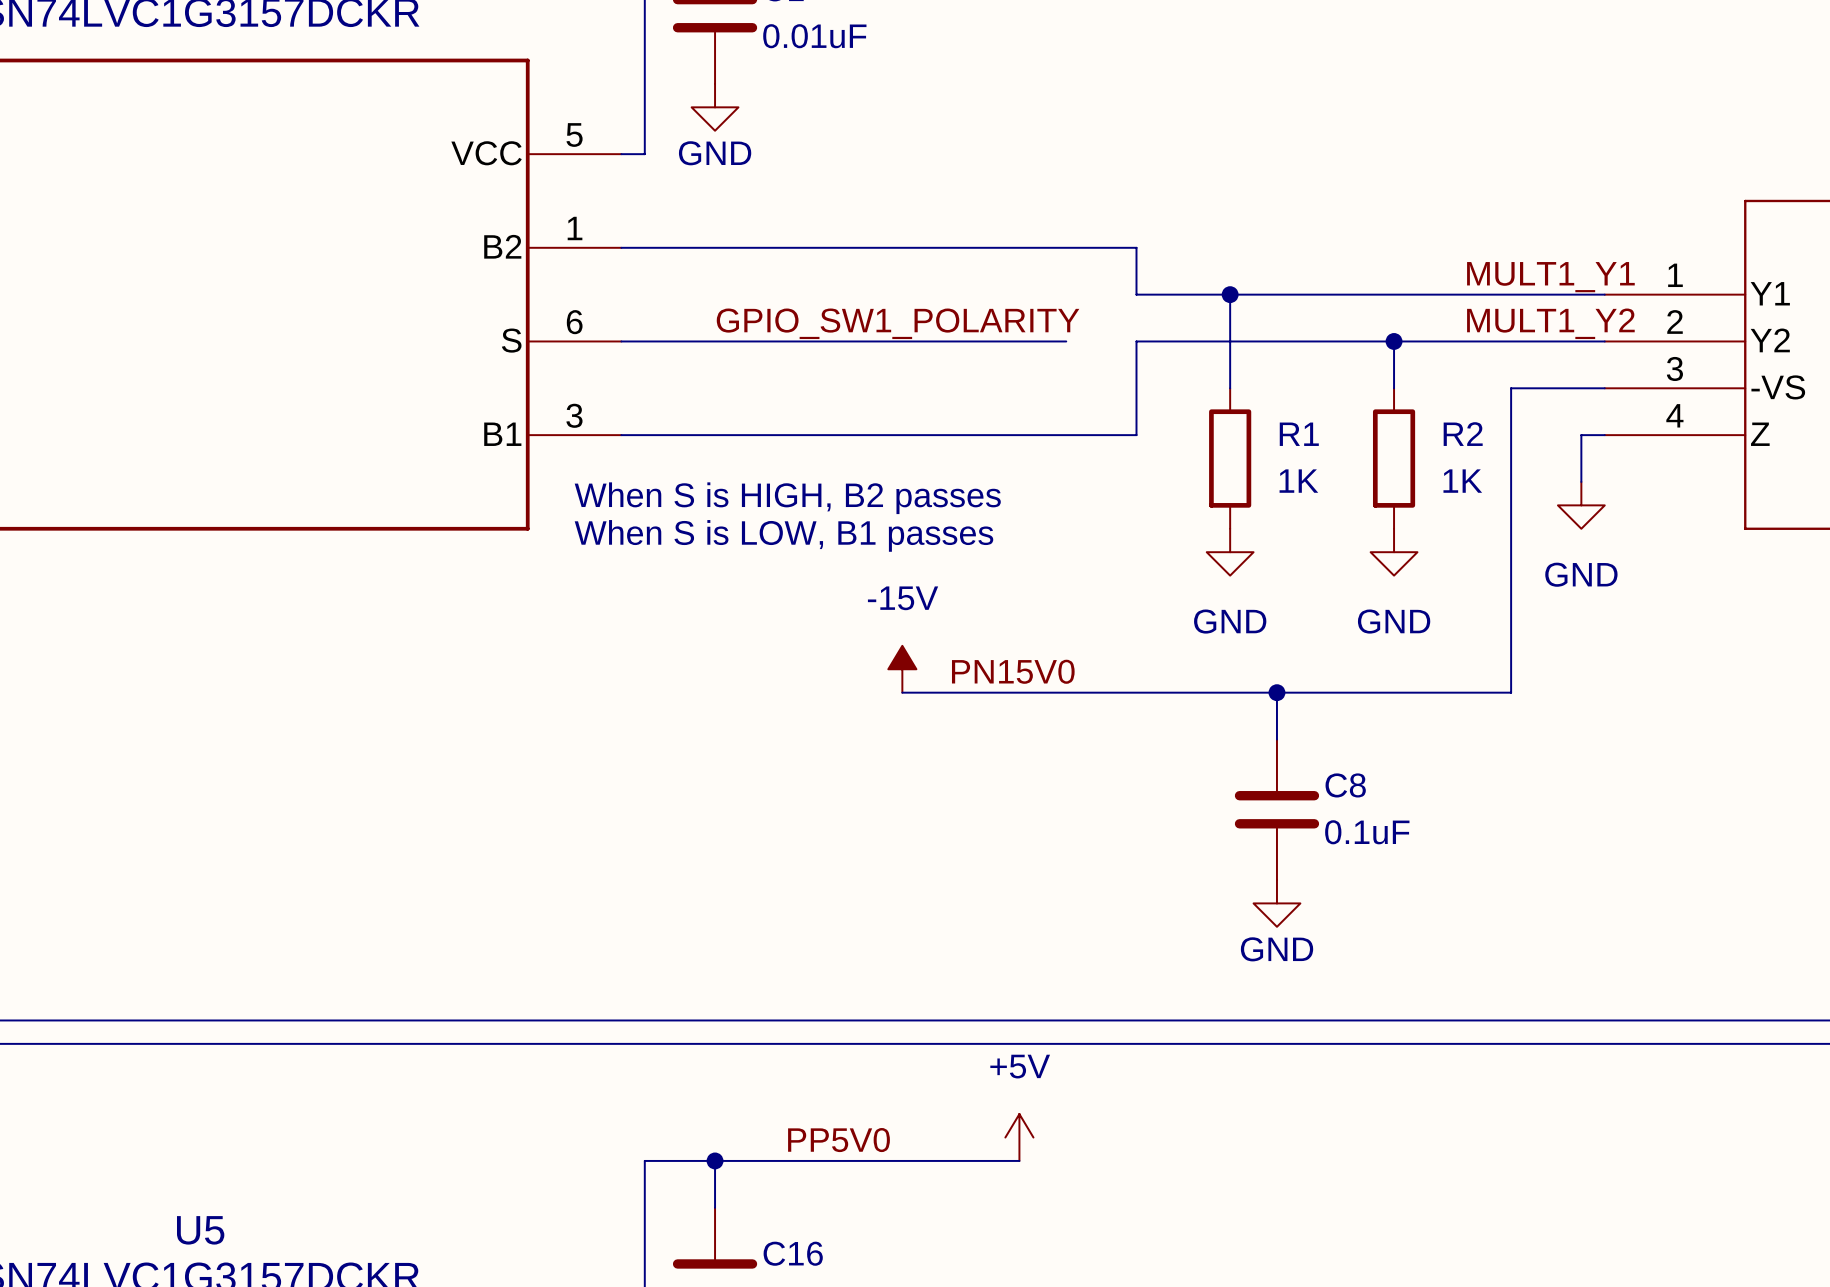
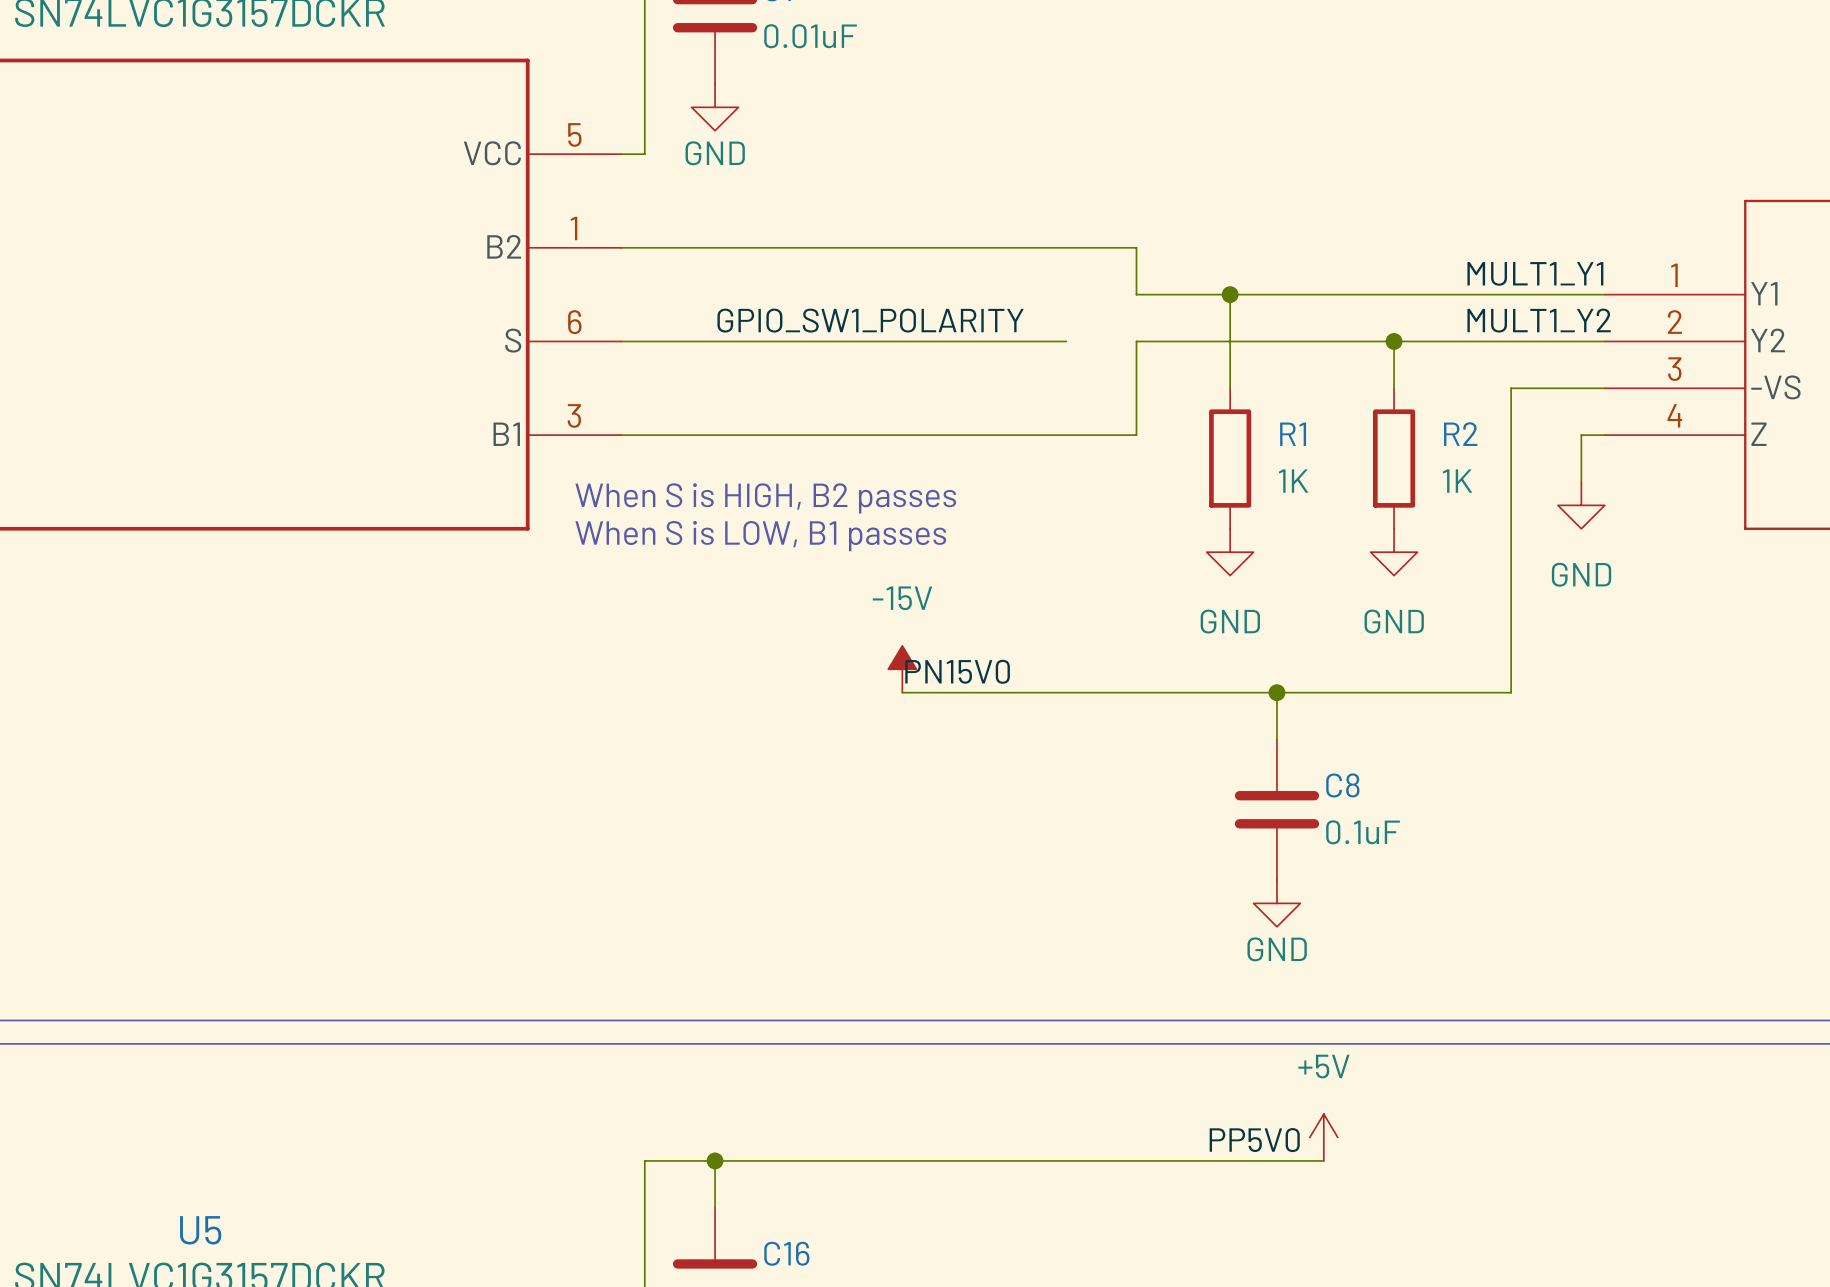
label position: PN15V0 (1013, 671) -> PN15V0 (957, 671)
power symbol position: +5V (1019, 1137) -> +5V (1323, 1137)
label position: PP5V0 (838, 1140) -> PP5V0 (1254, 1140)
wire: none -> (1019, 1160) (1323, 1160)

